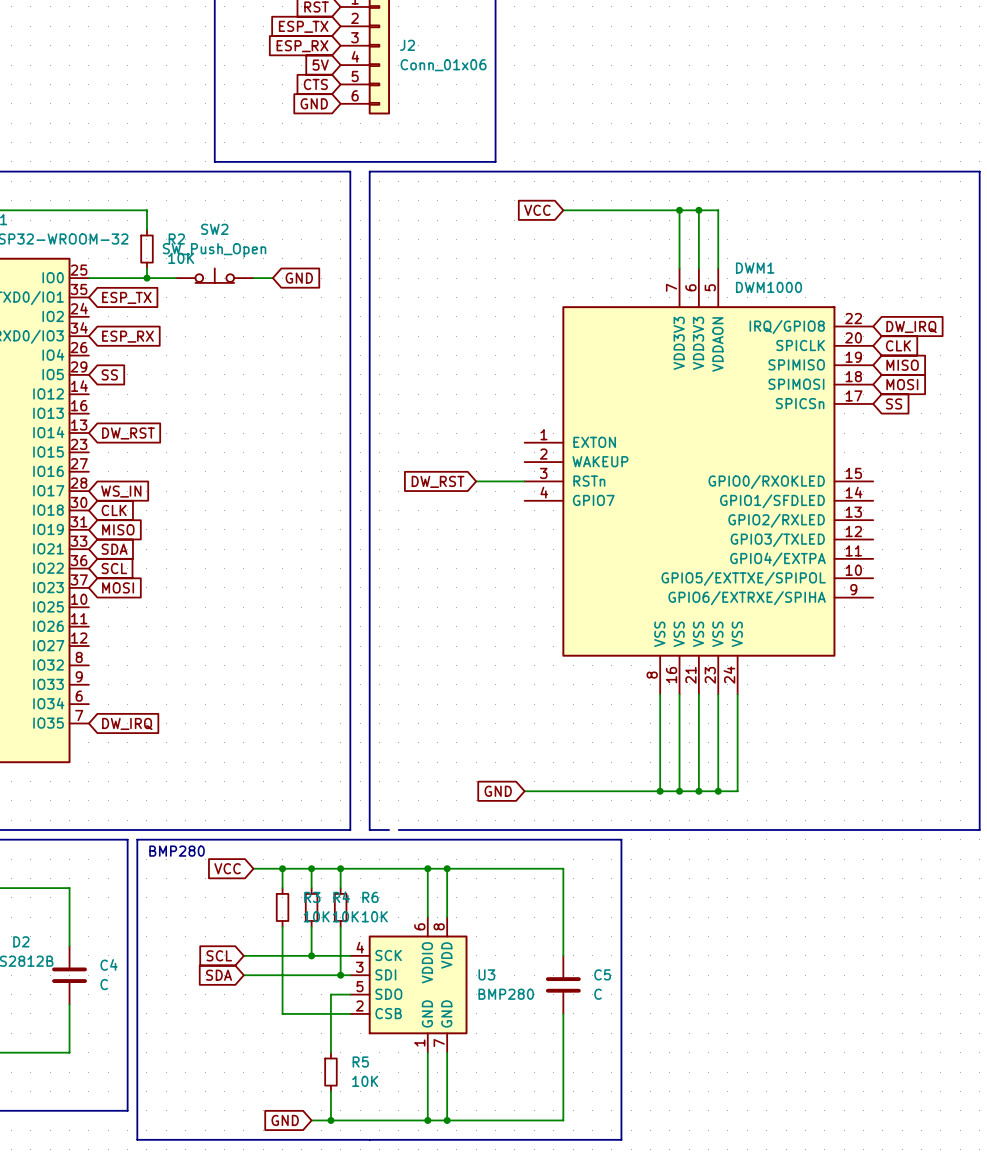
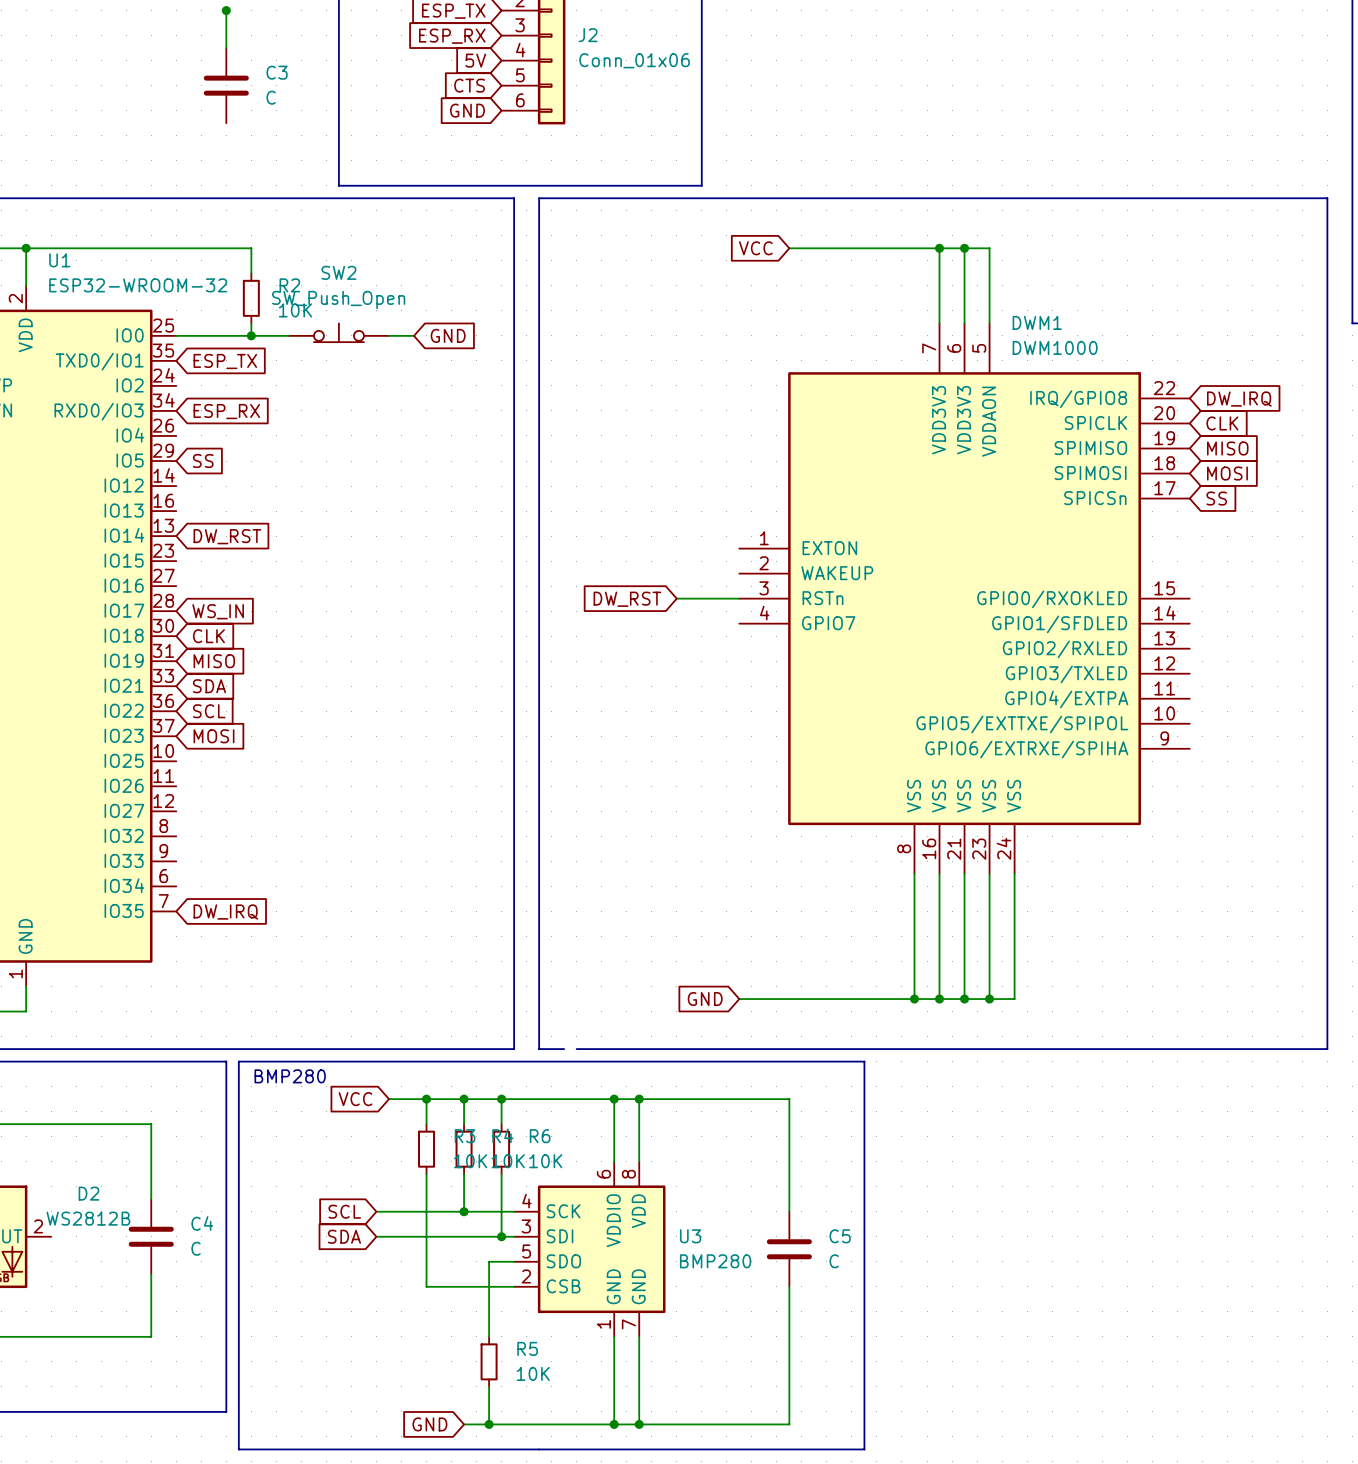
wire: none -> (226, 10) (226, 48)
junction: none -> (226, 10)
C3: none -> C (226, 85)

